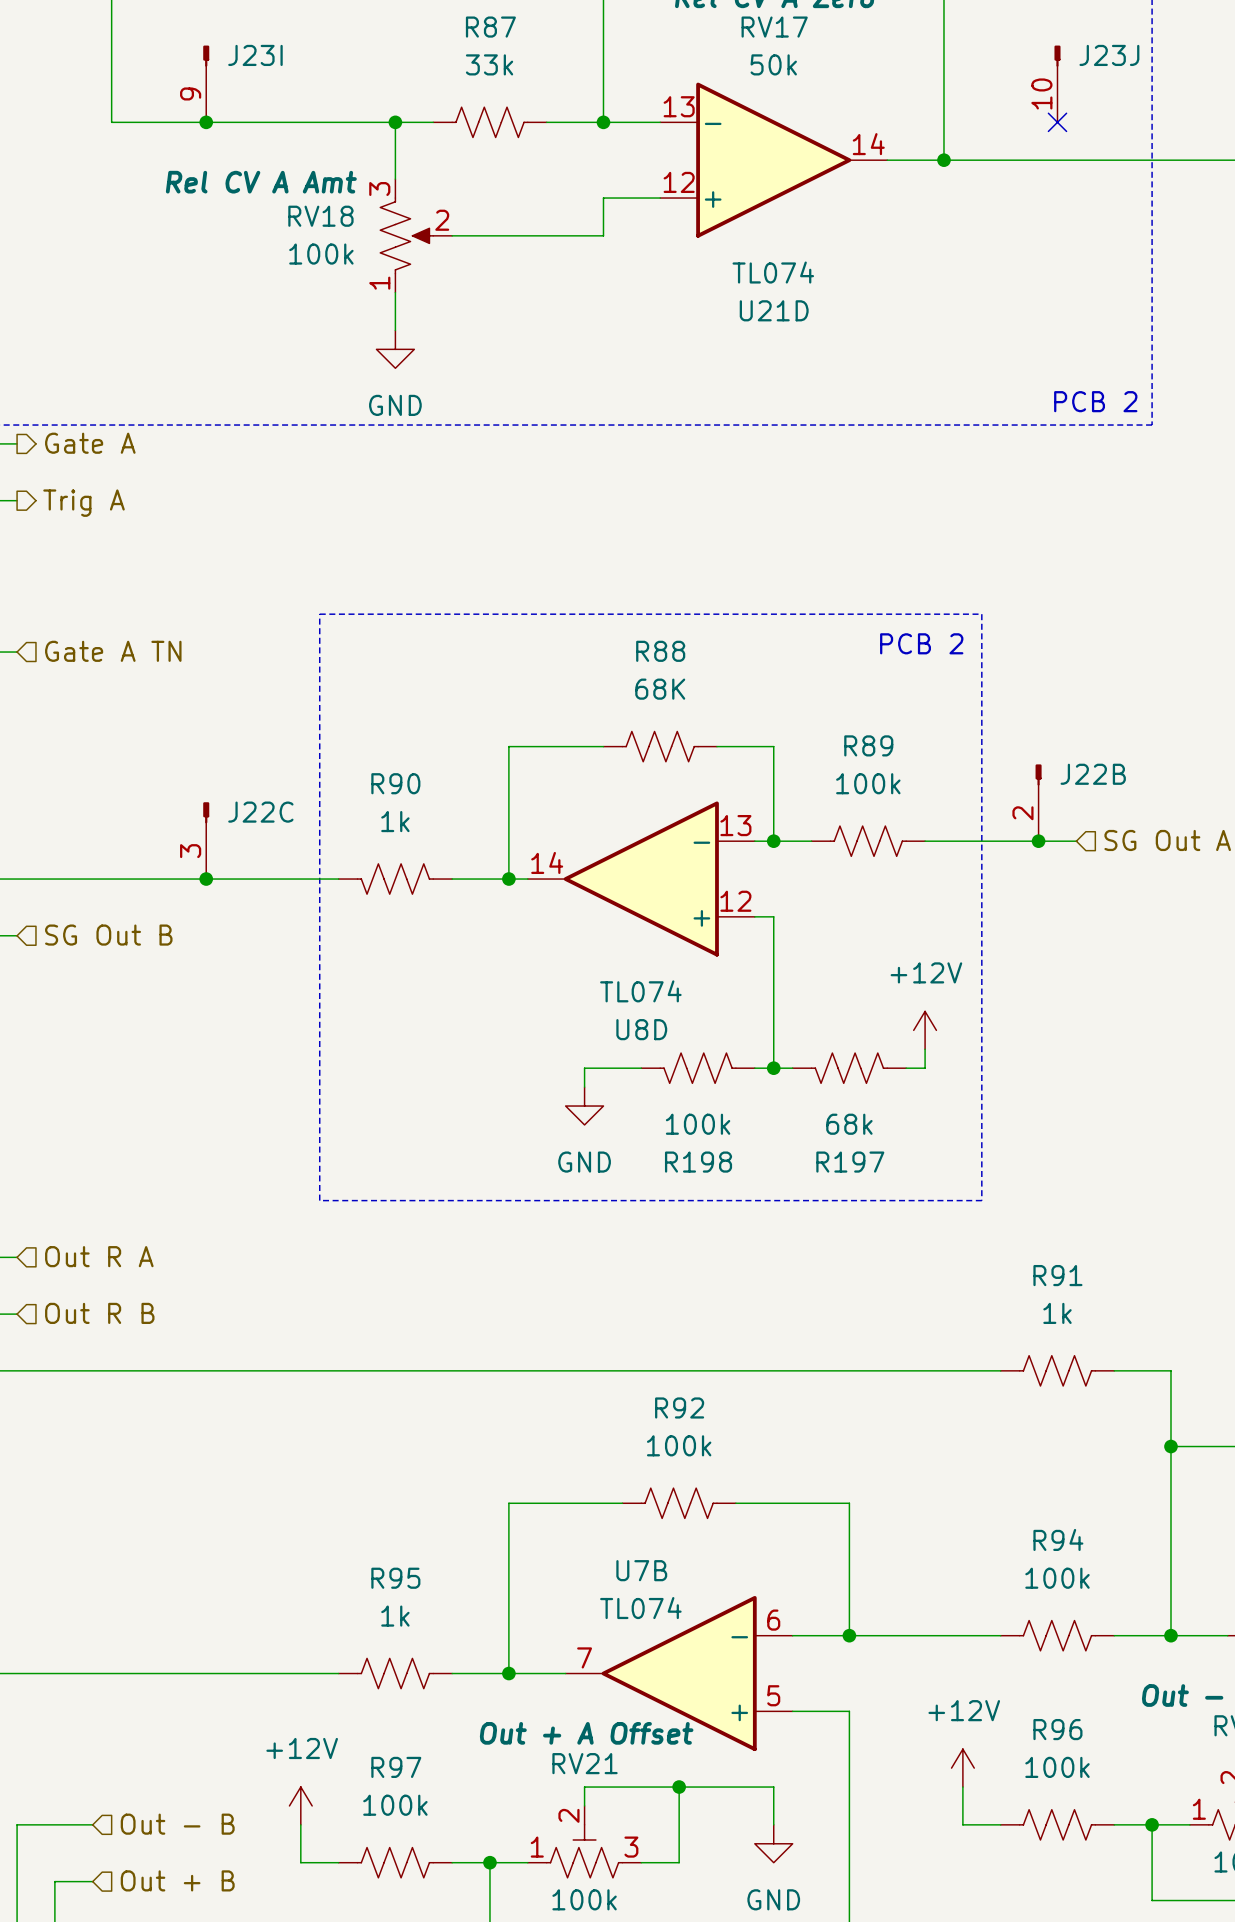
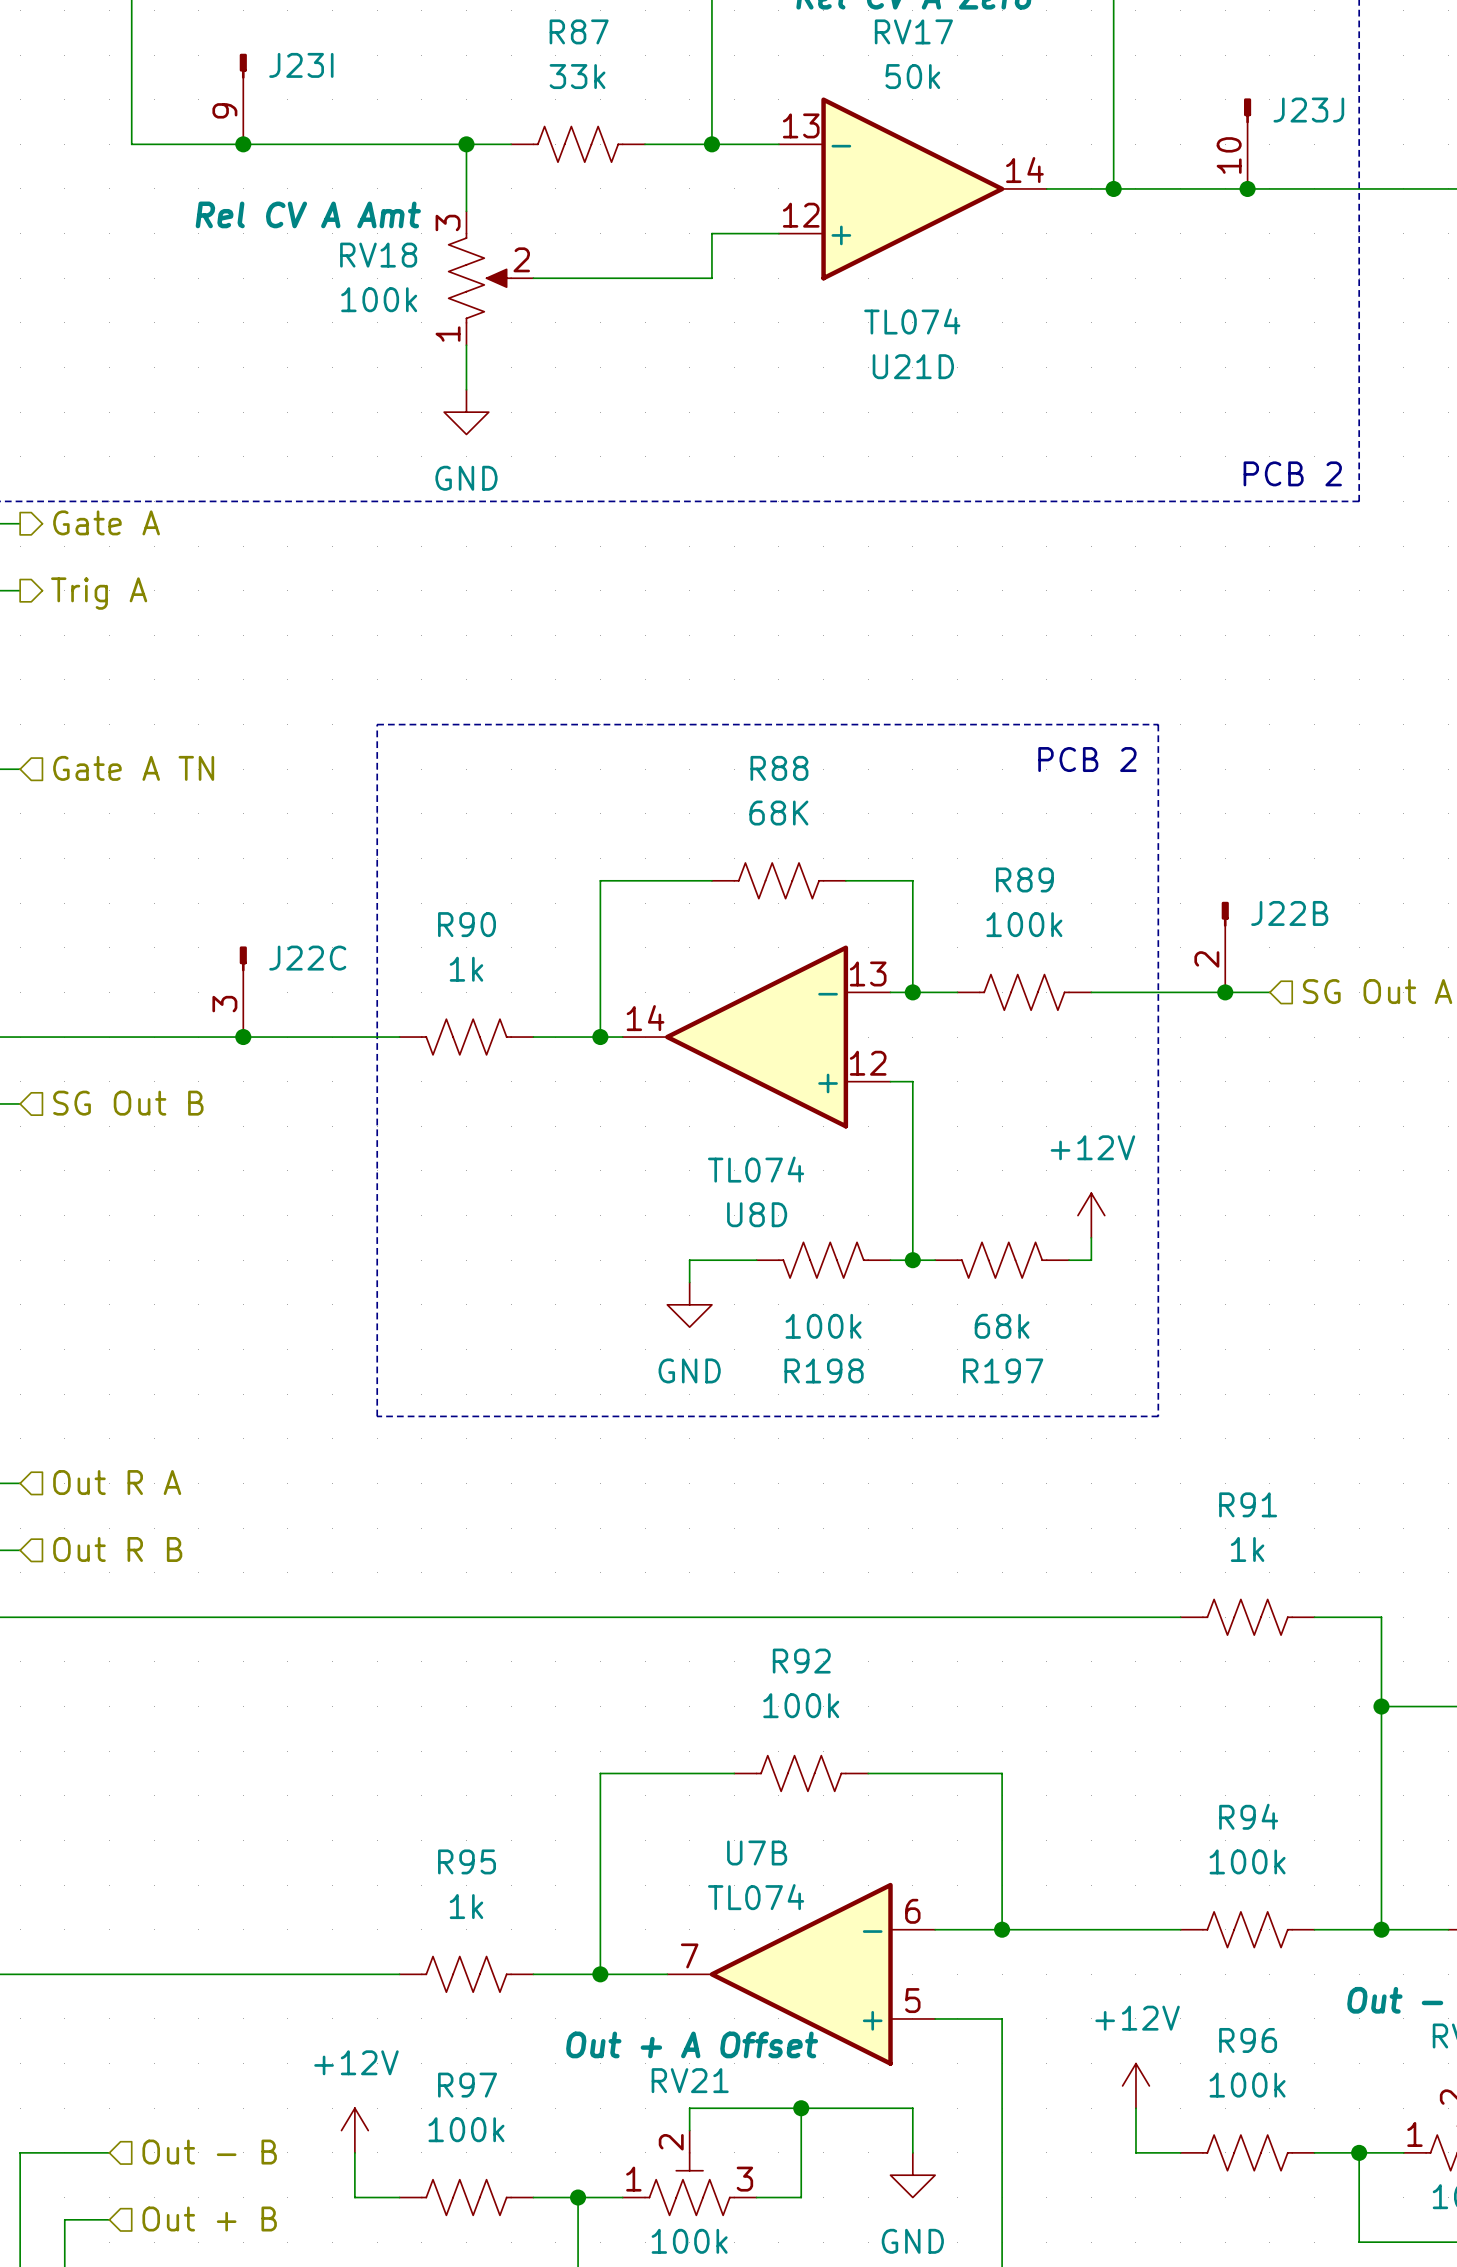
J23J position: (1057, 83) -> (1247, 143)
no-connect mark: (1057, 122) -> none
junction: none -> (1247, 188)

